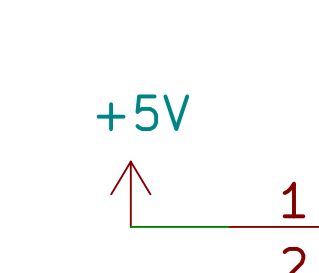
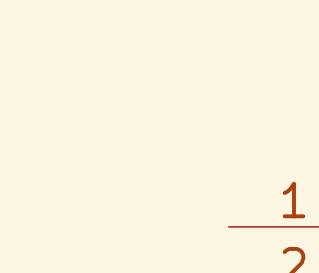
power symbol: +5V (130, 194) -> none
wire: (130, 226) (228, 226) -> none

